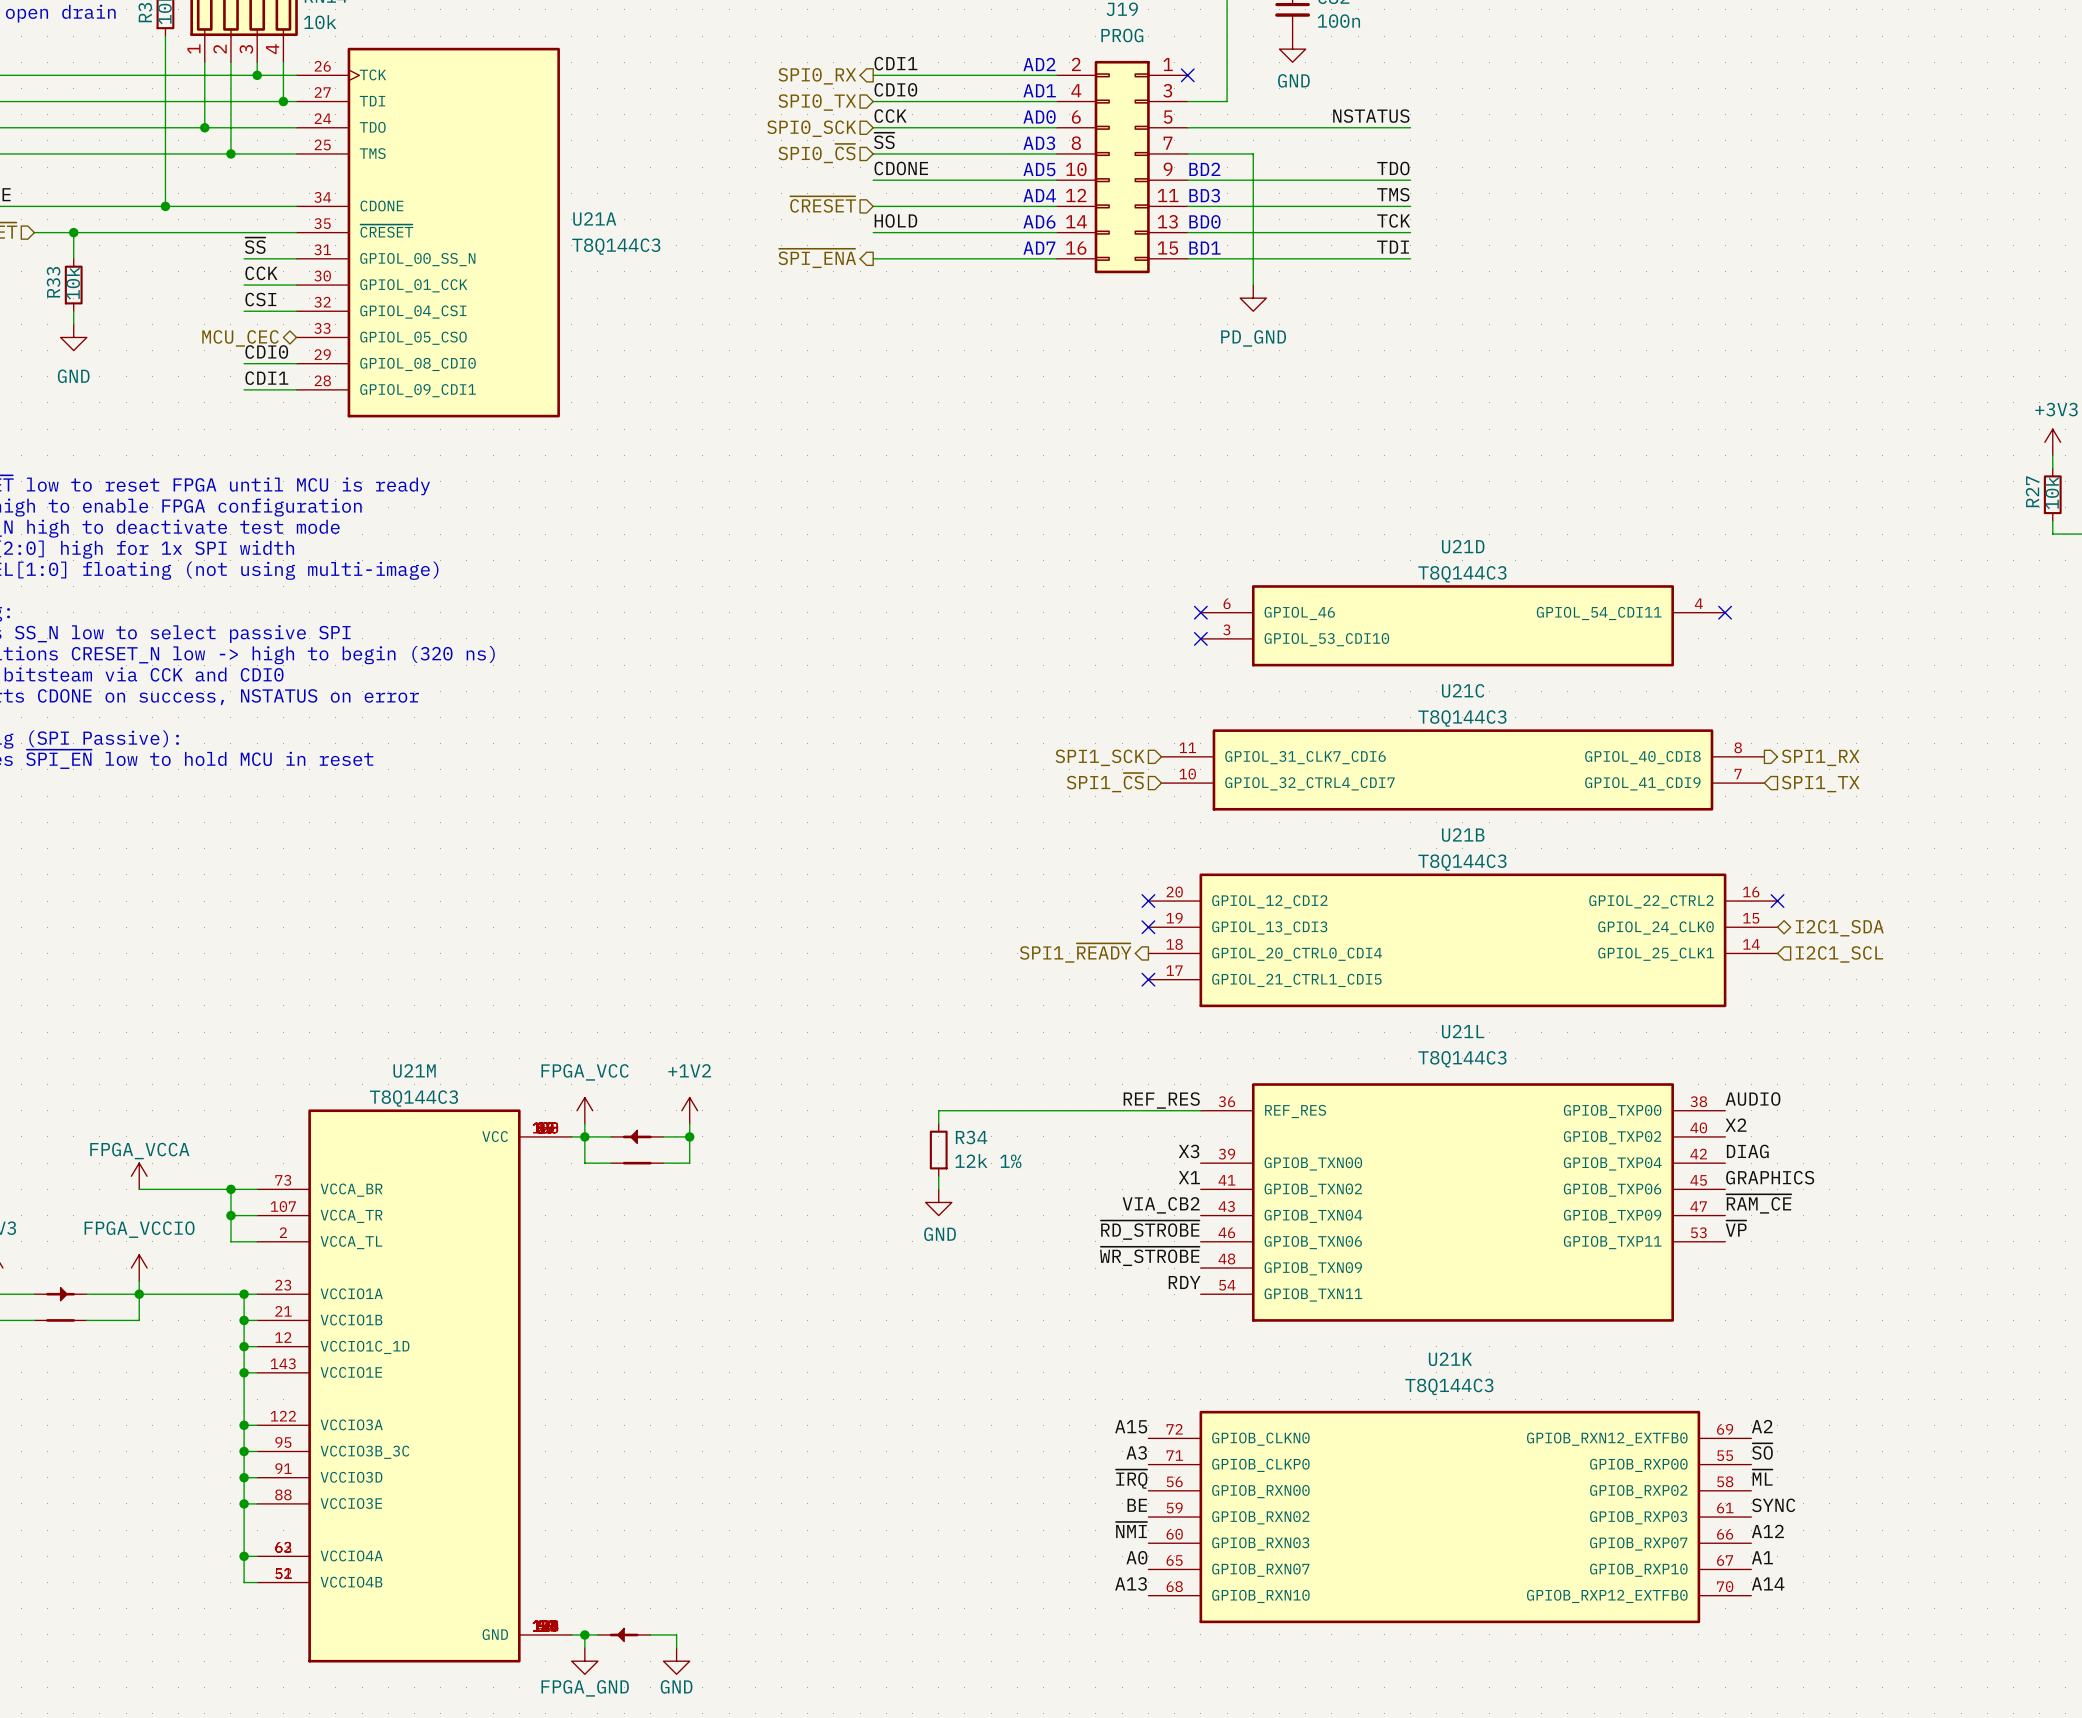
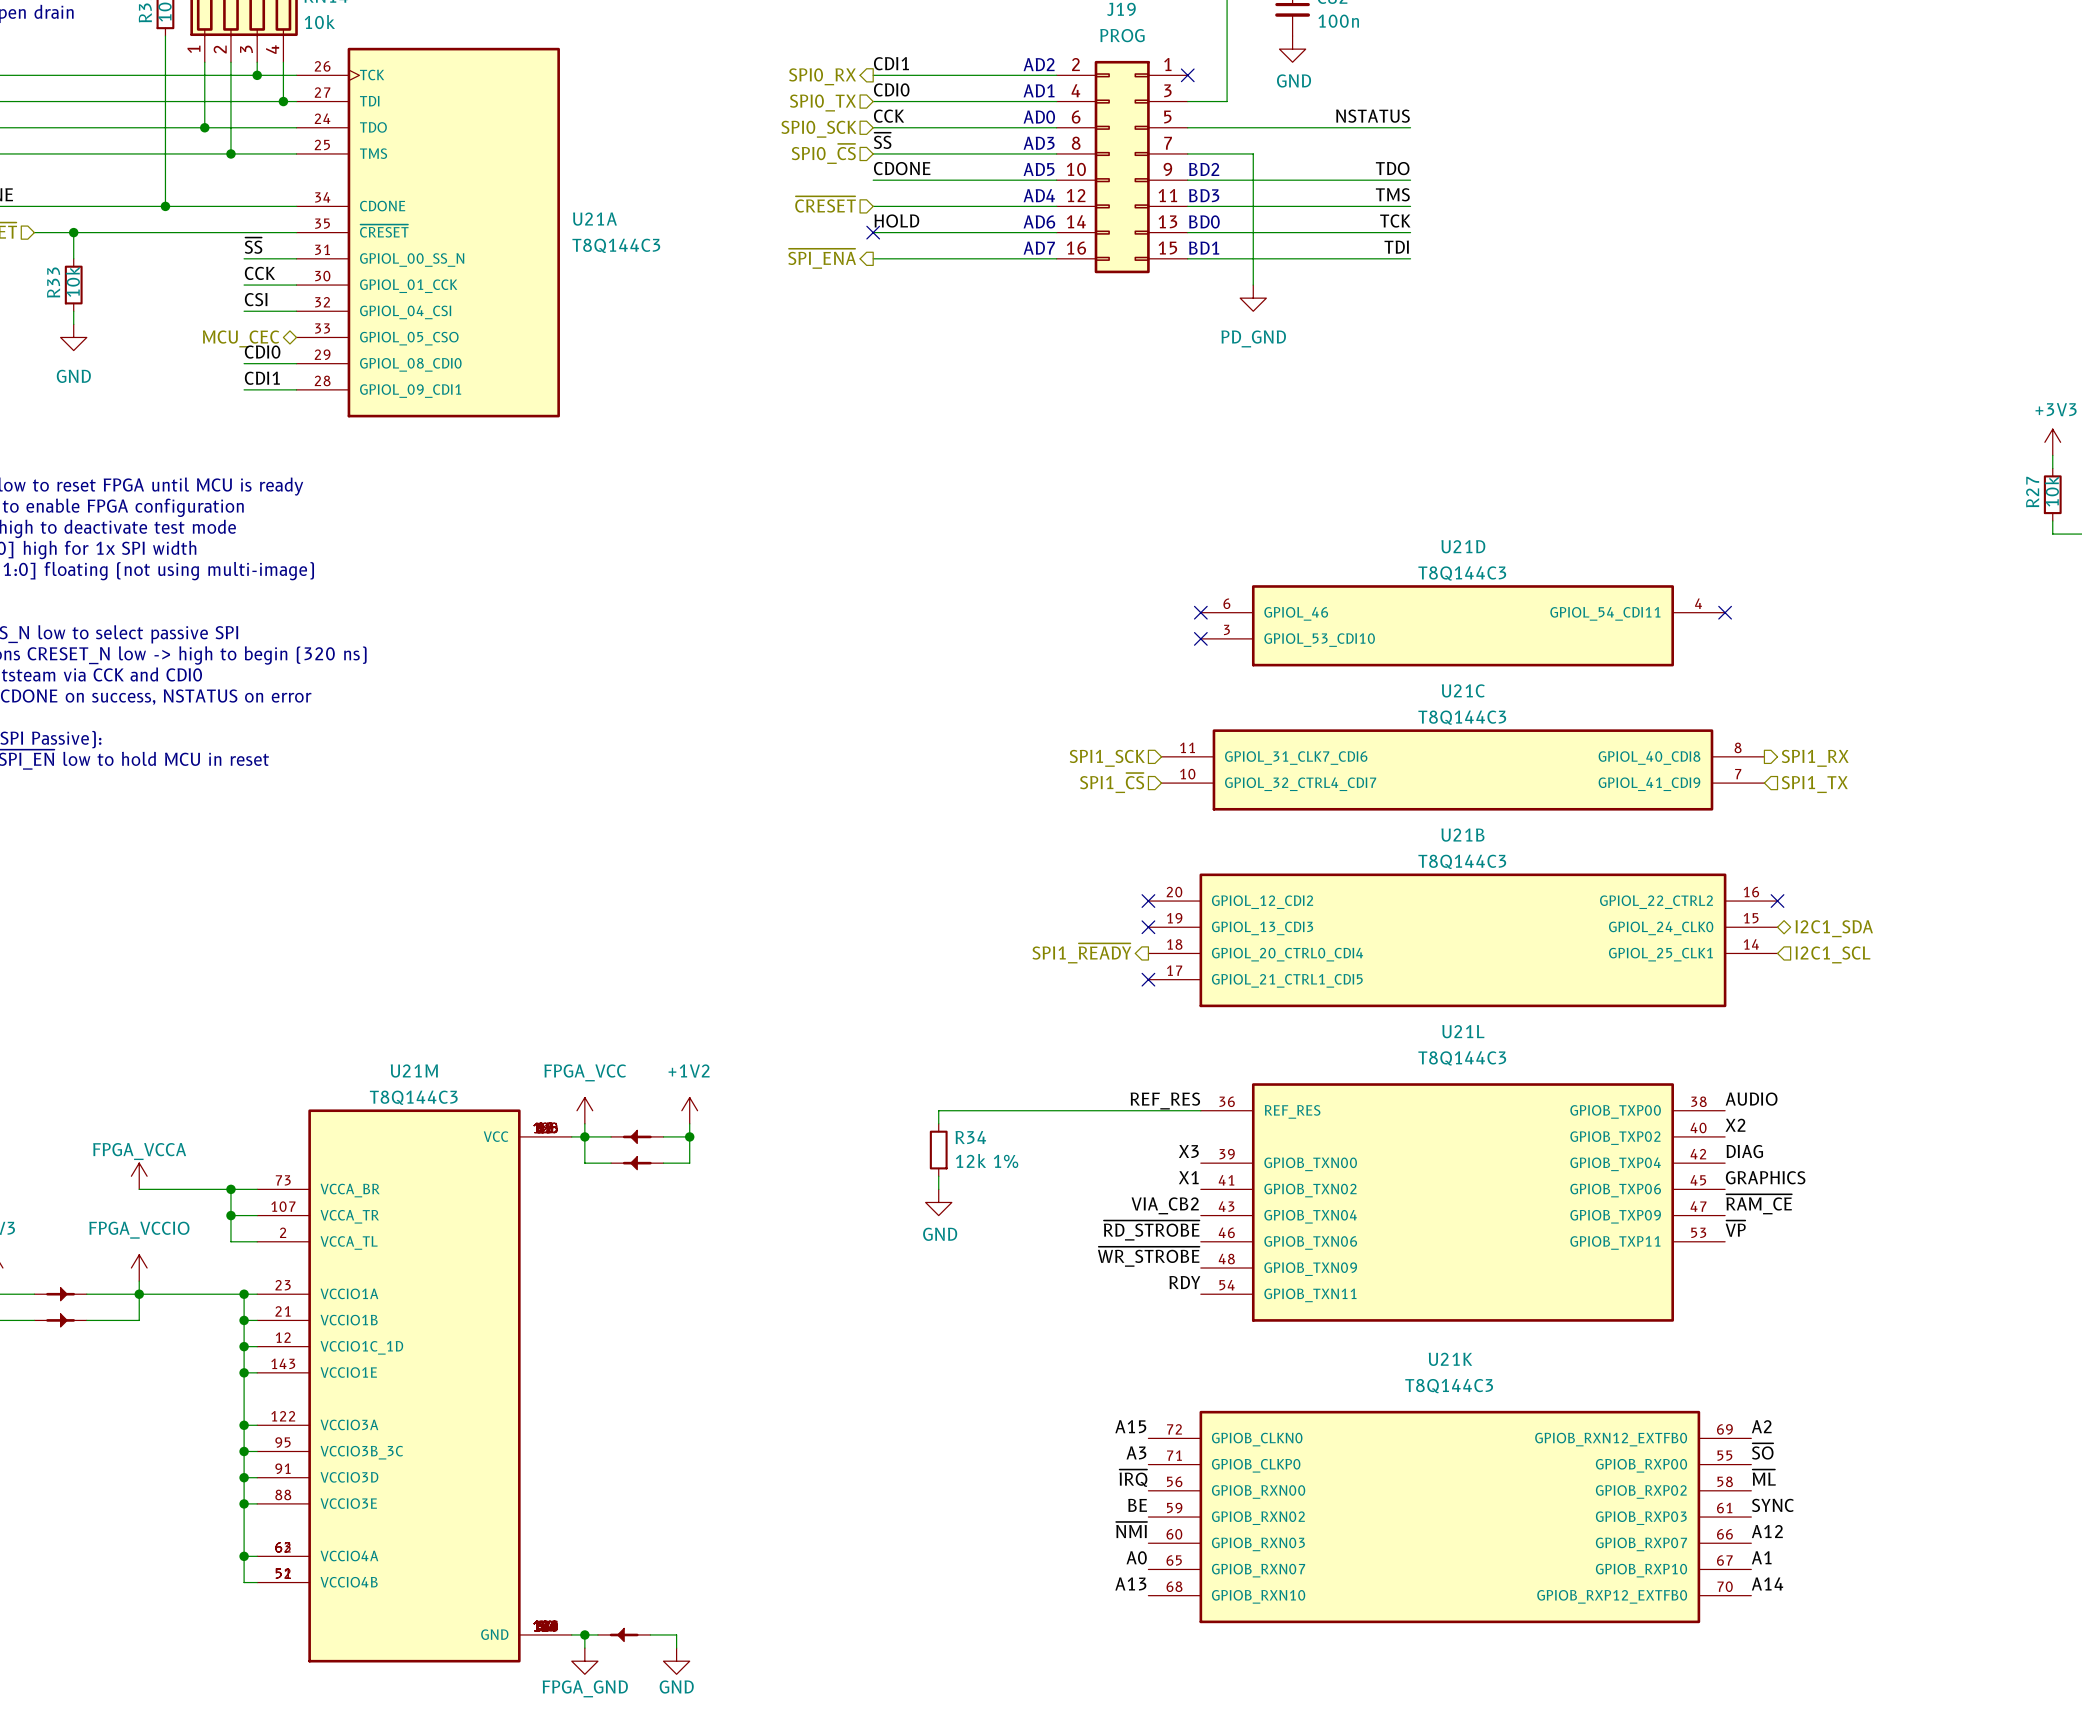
no-connect mark: none -> (873, 232)
part symbol: [611, 1161, 664, 1165] -> [611, 1156, 664, 1170]
part symbol: [34, 1319, 87, 1322] -> [34, 1313, 87, 1327]

